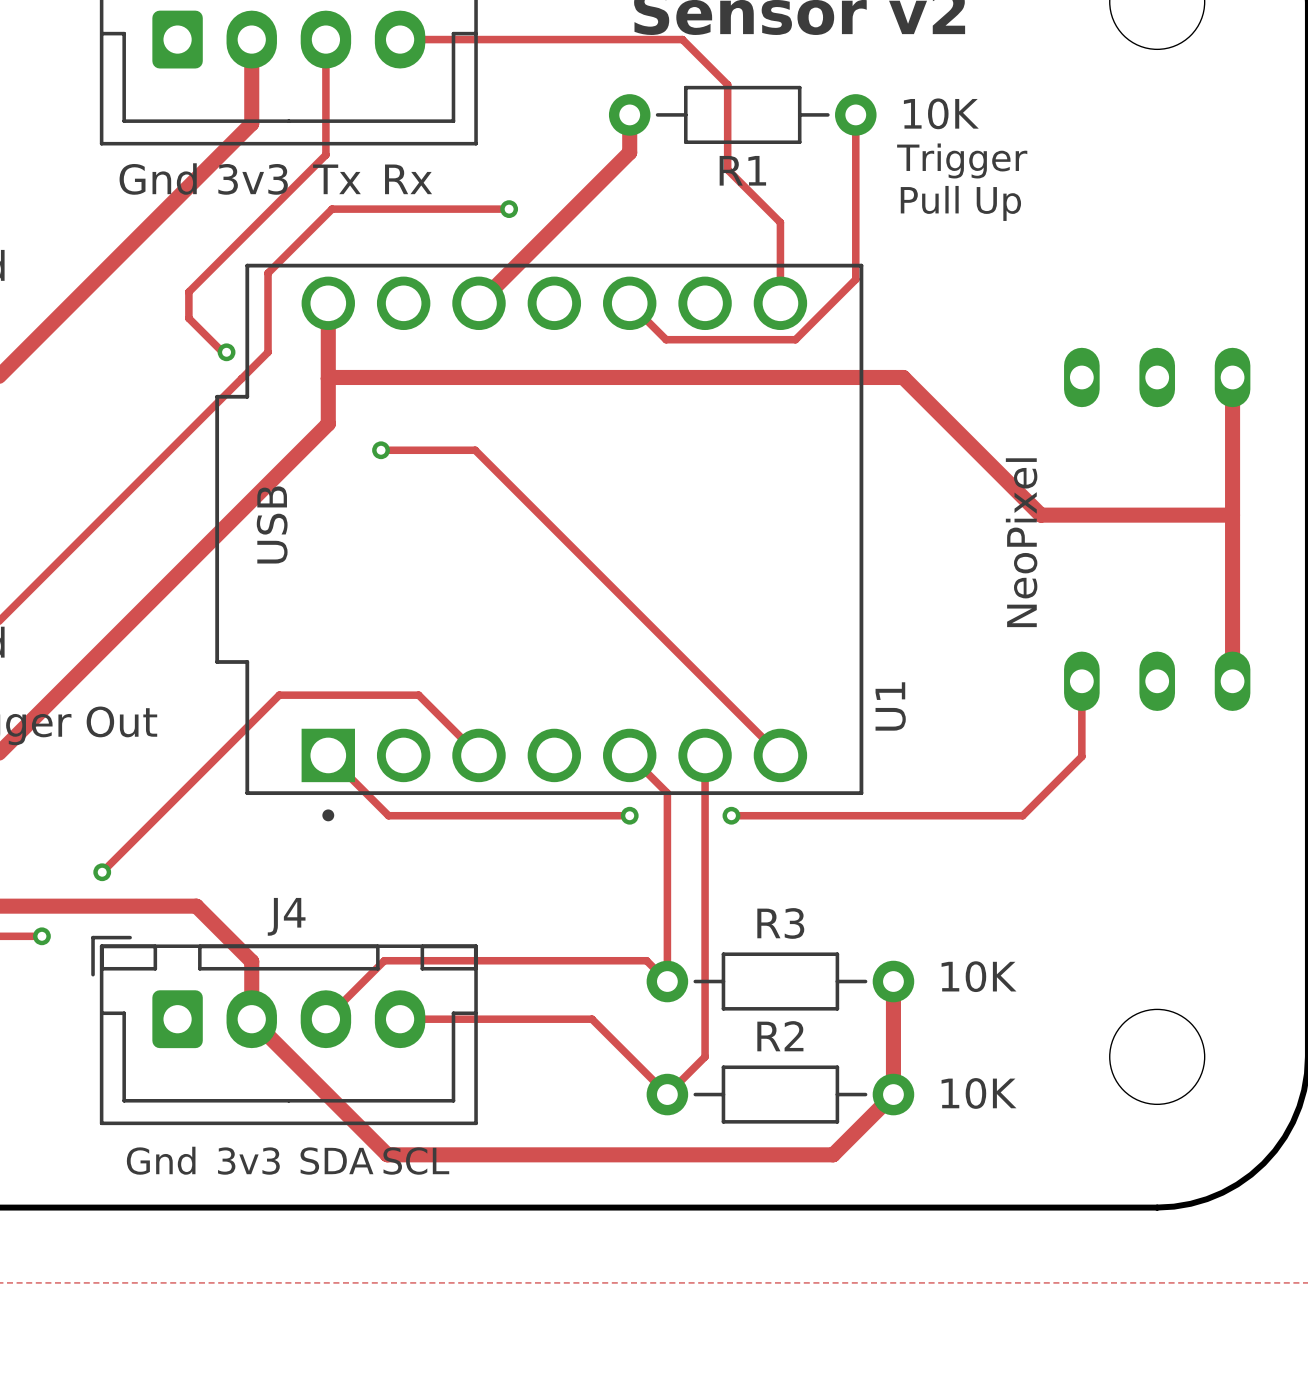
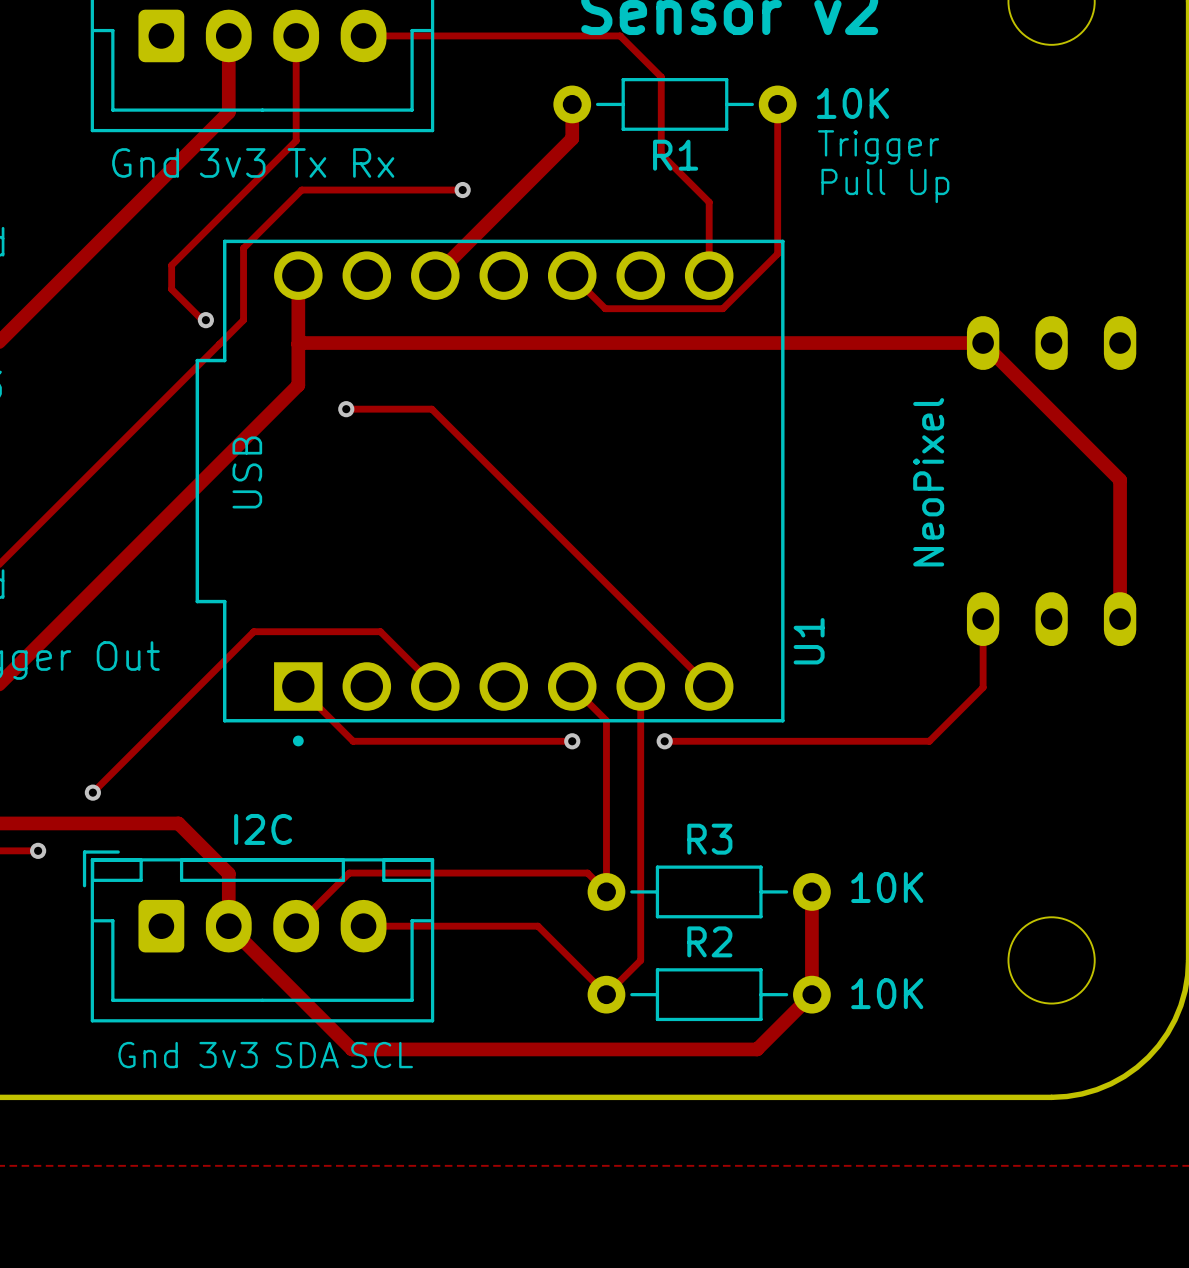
track: (903, 377) (1040, 515) (1232, 515) -> (820, 343) (983, 343) (1120, 479)
track: (1232, 377) (1232, 528) -> none
J4 name: J4 (286, 916) -> I2C (263, 829)

